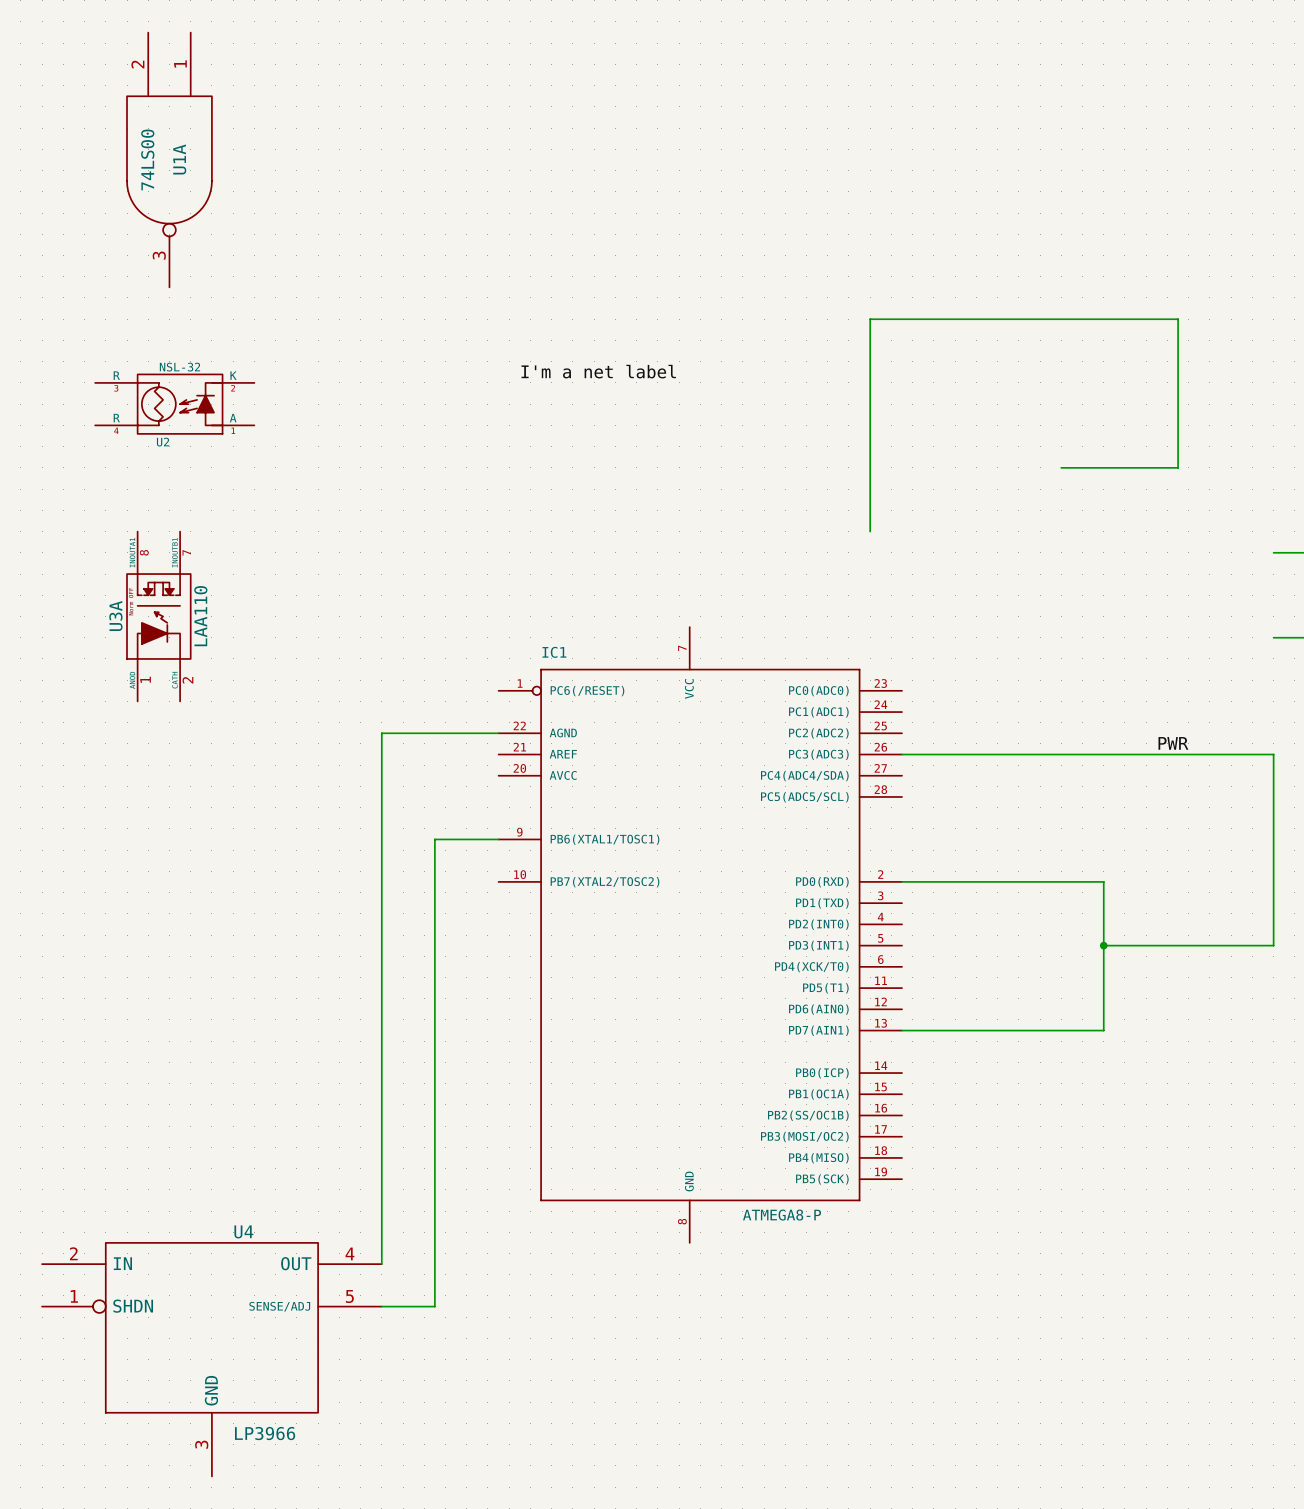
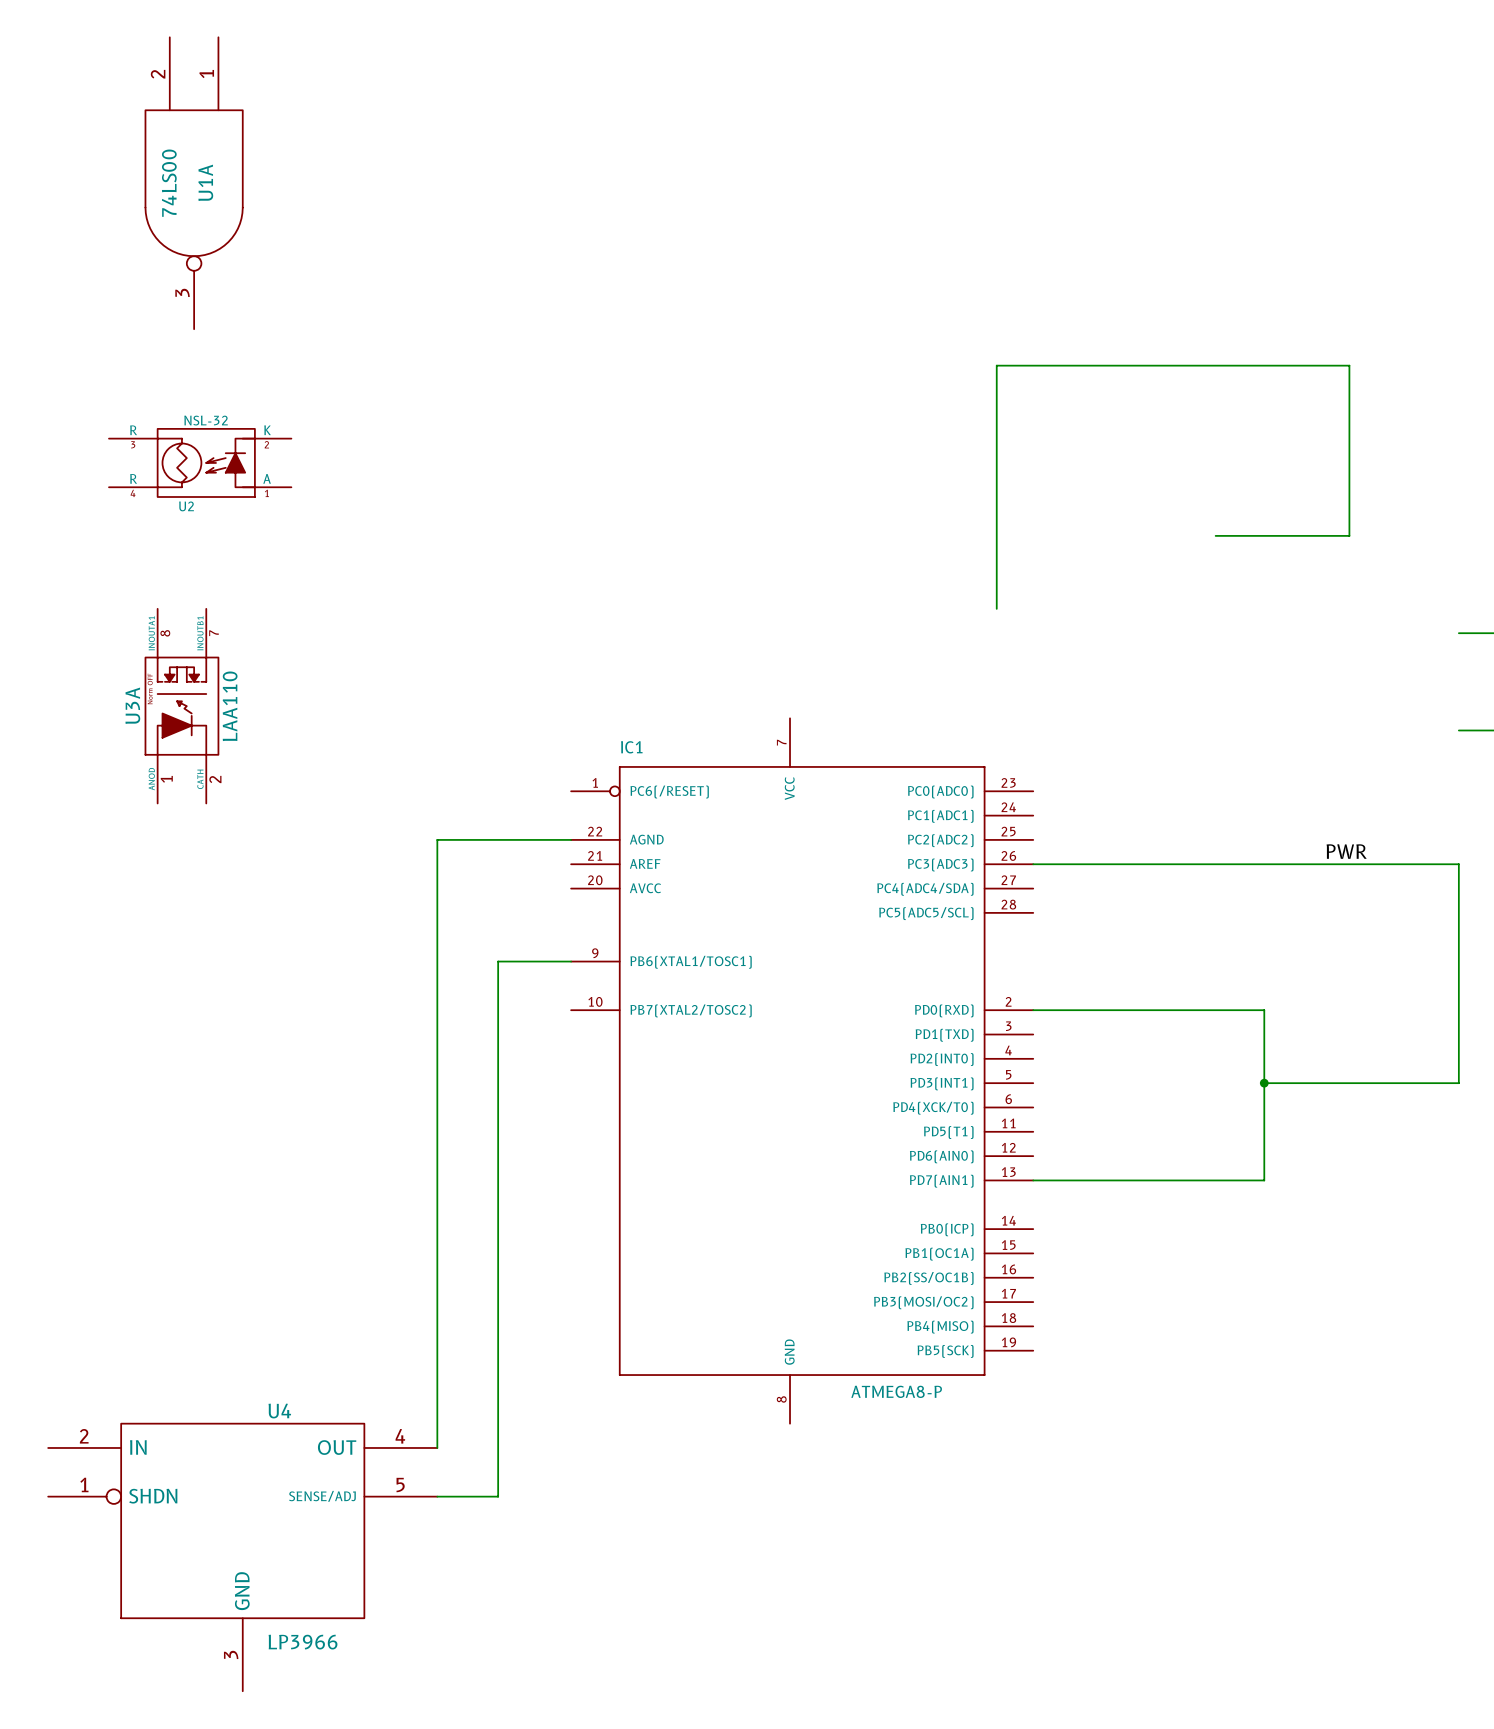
label: I'm a net label (598, 371) -> none

